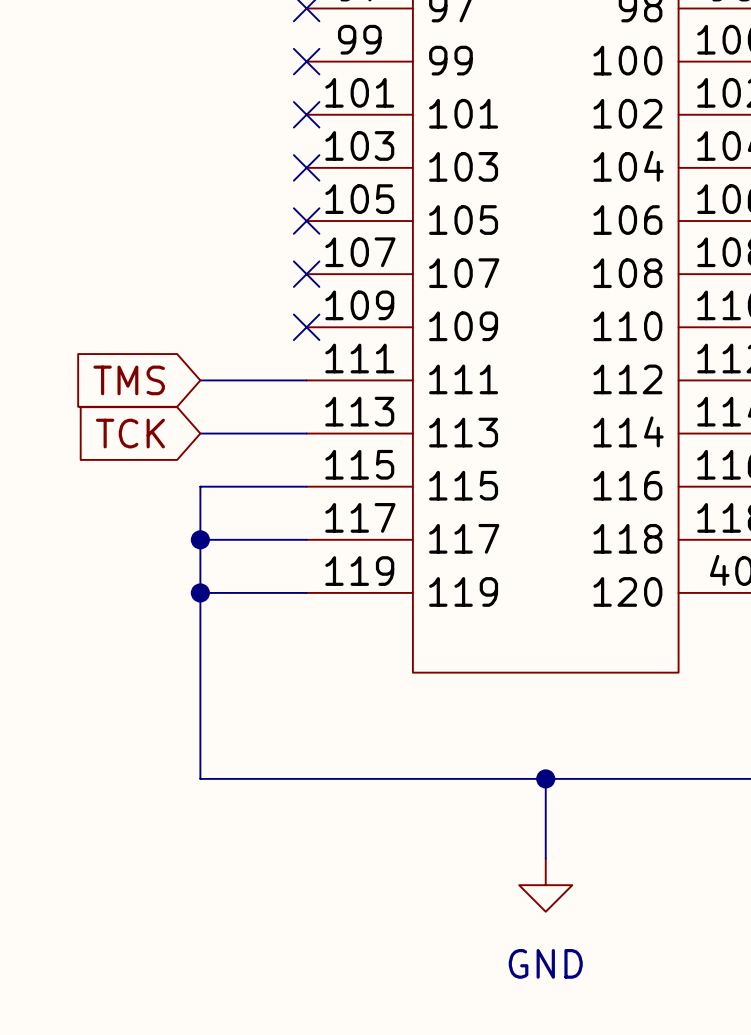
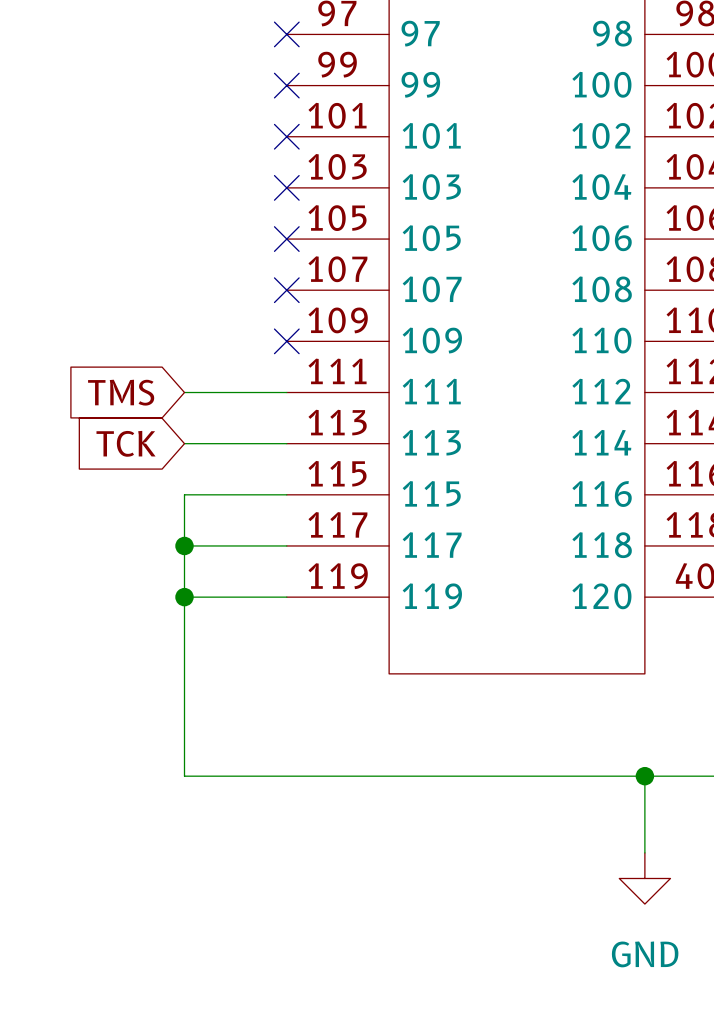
wire: (545, 778) (545, 858) -> (644, 776) (644, 852)
junction: (545, 778) -> none
junction: none -> (644, 776)
power symbol position: GND (545, 885) -> GND (644, 878)

